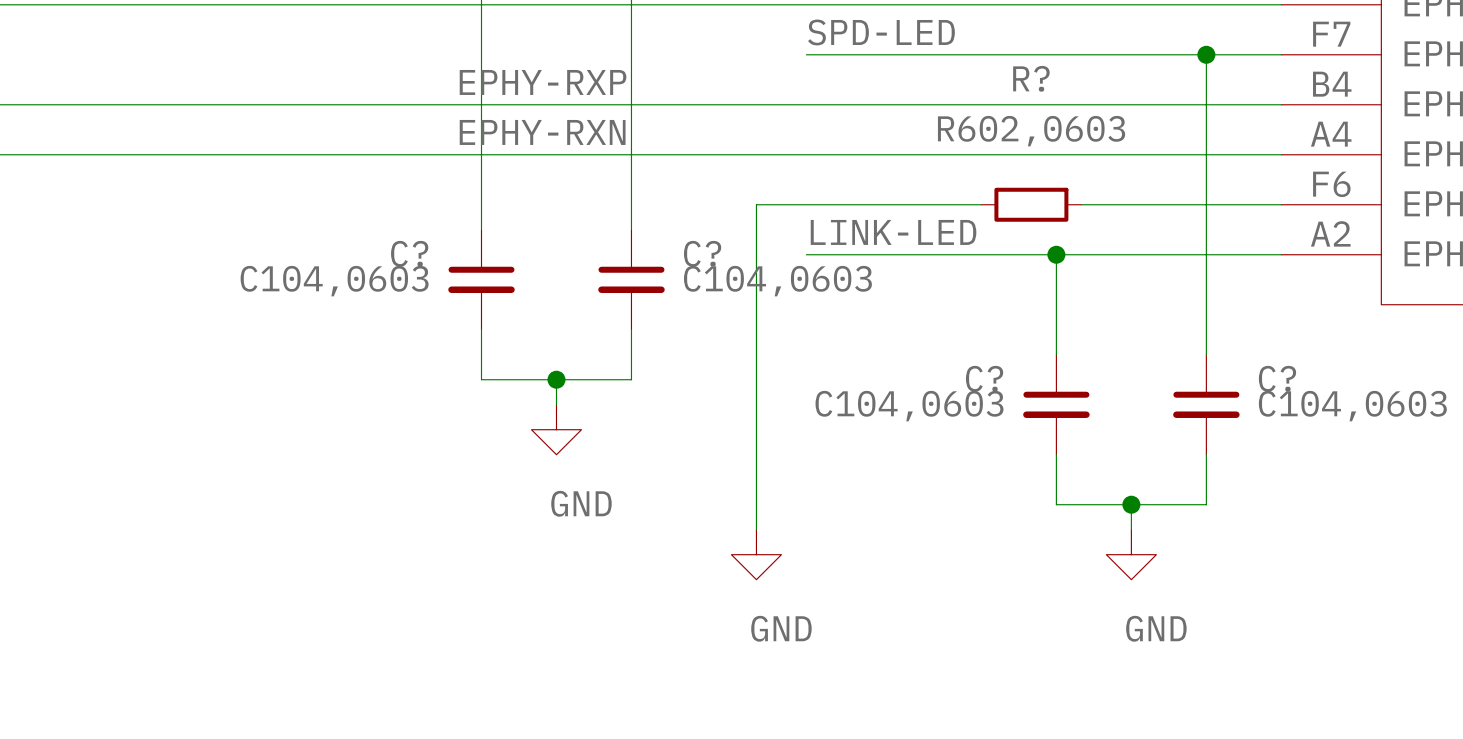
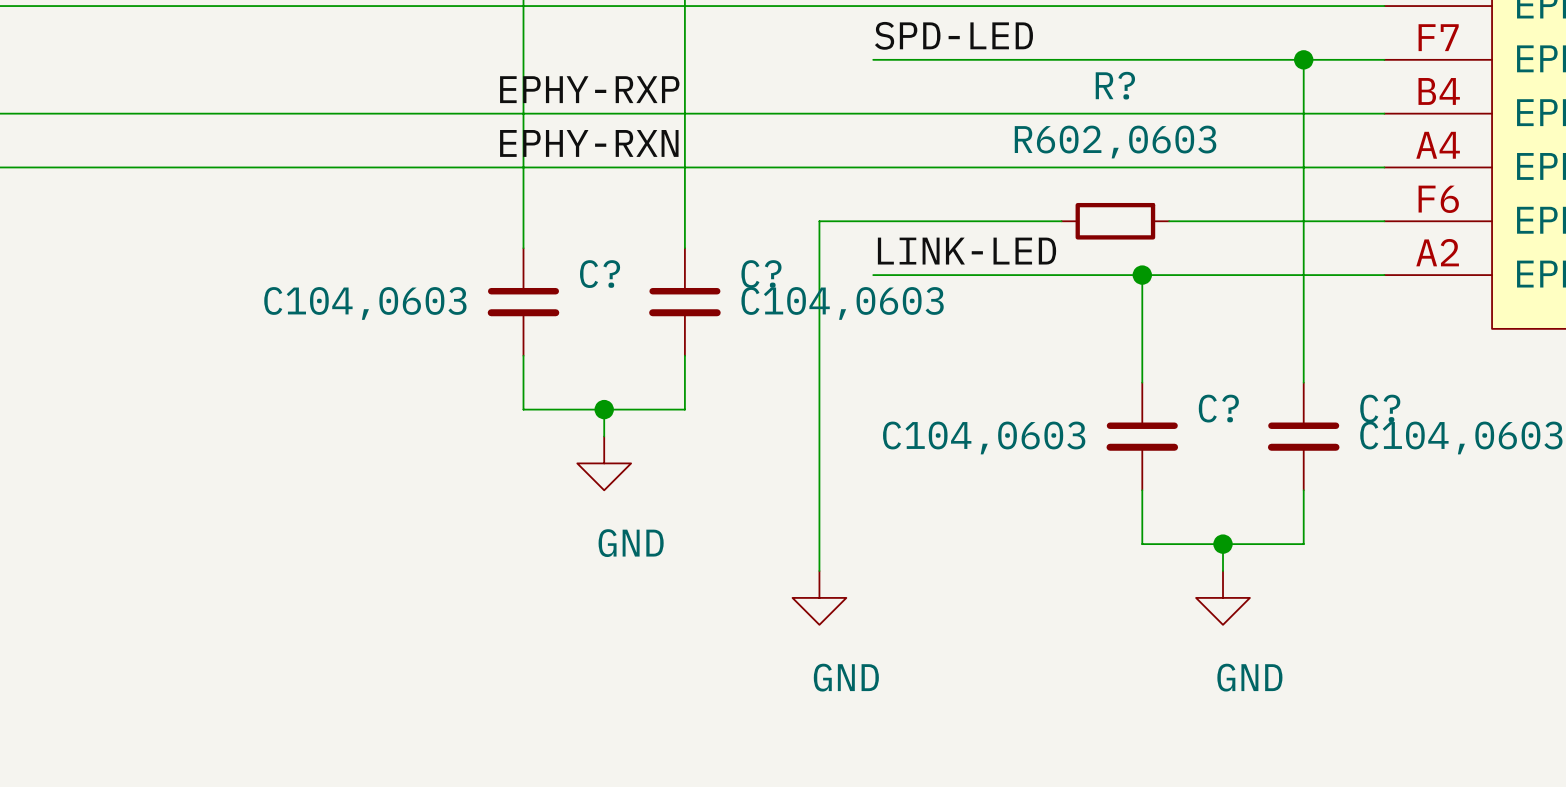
C? name position: C? (409, 253) -> C? (600, 274)
C? name position: C? (984, 378) -> C? (1218, 408)

